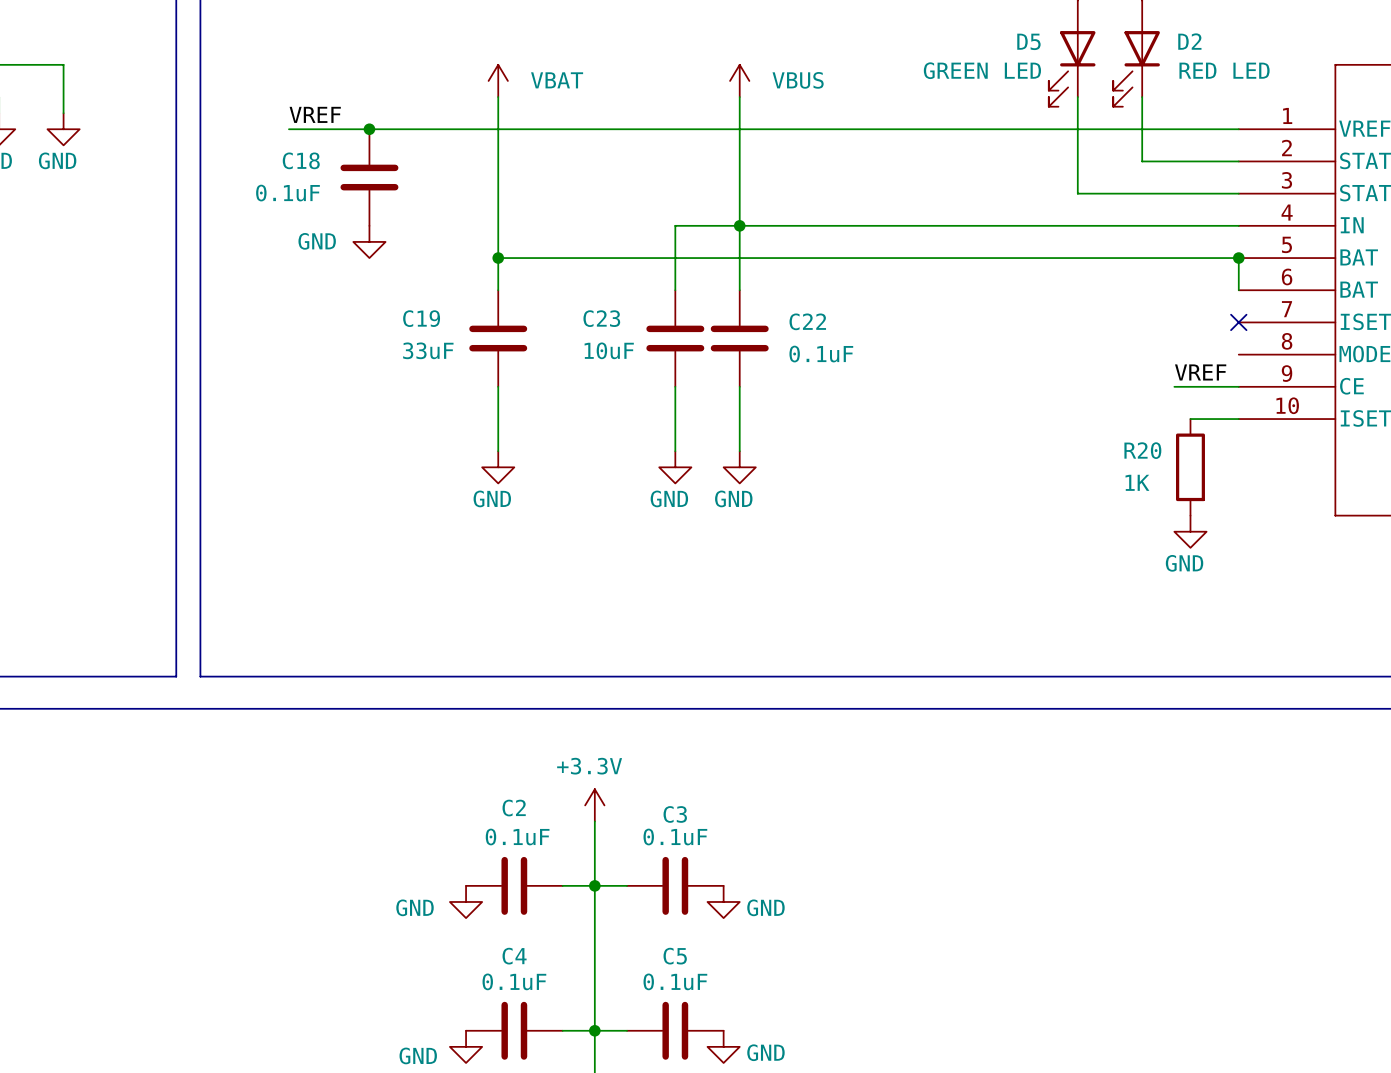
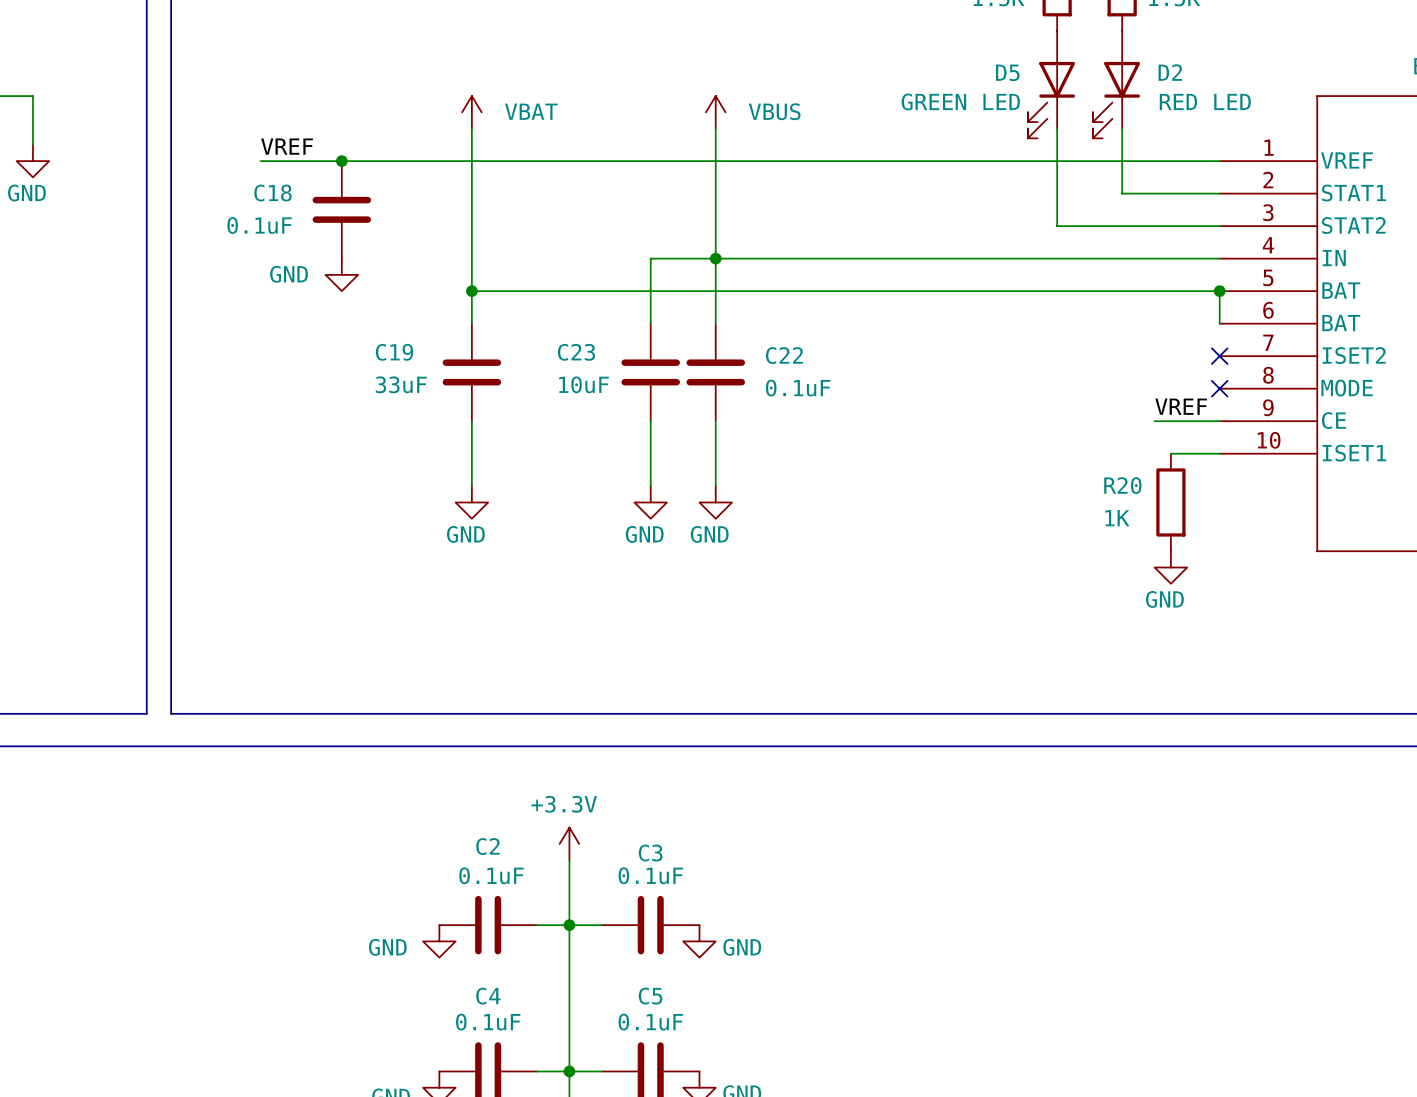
no-connect mark: none -> (1219, 388)

